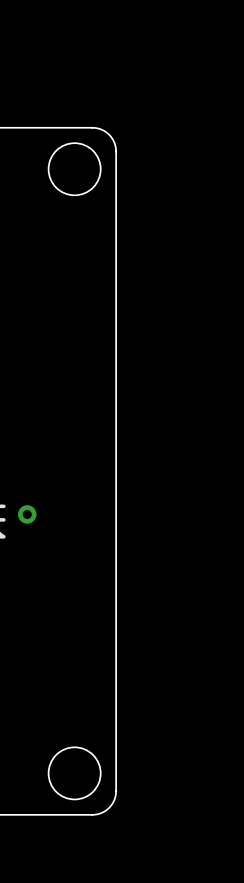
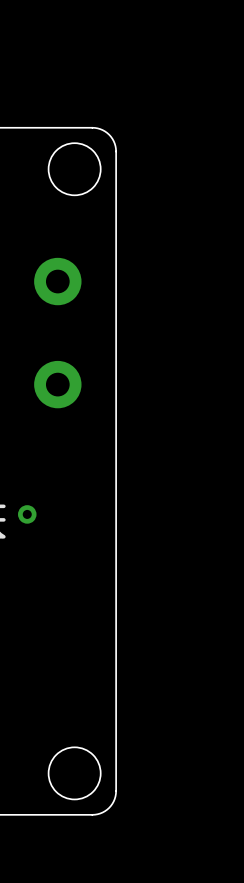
part: none -> (57, 281)
part: none -> (57, 384)

